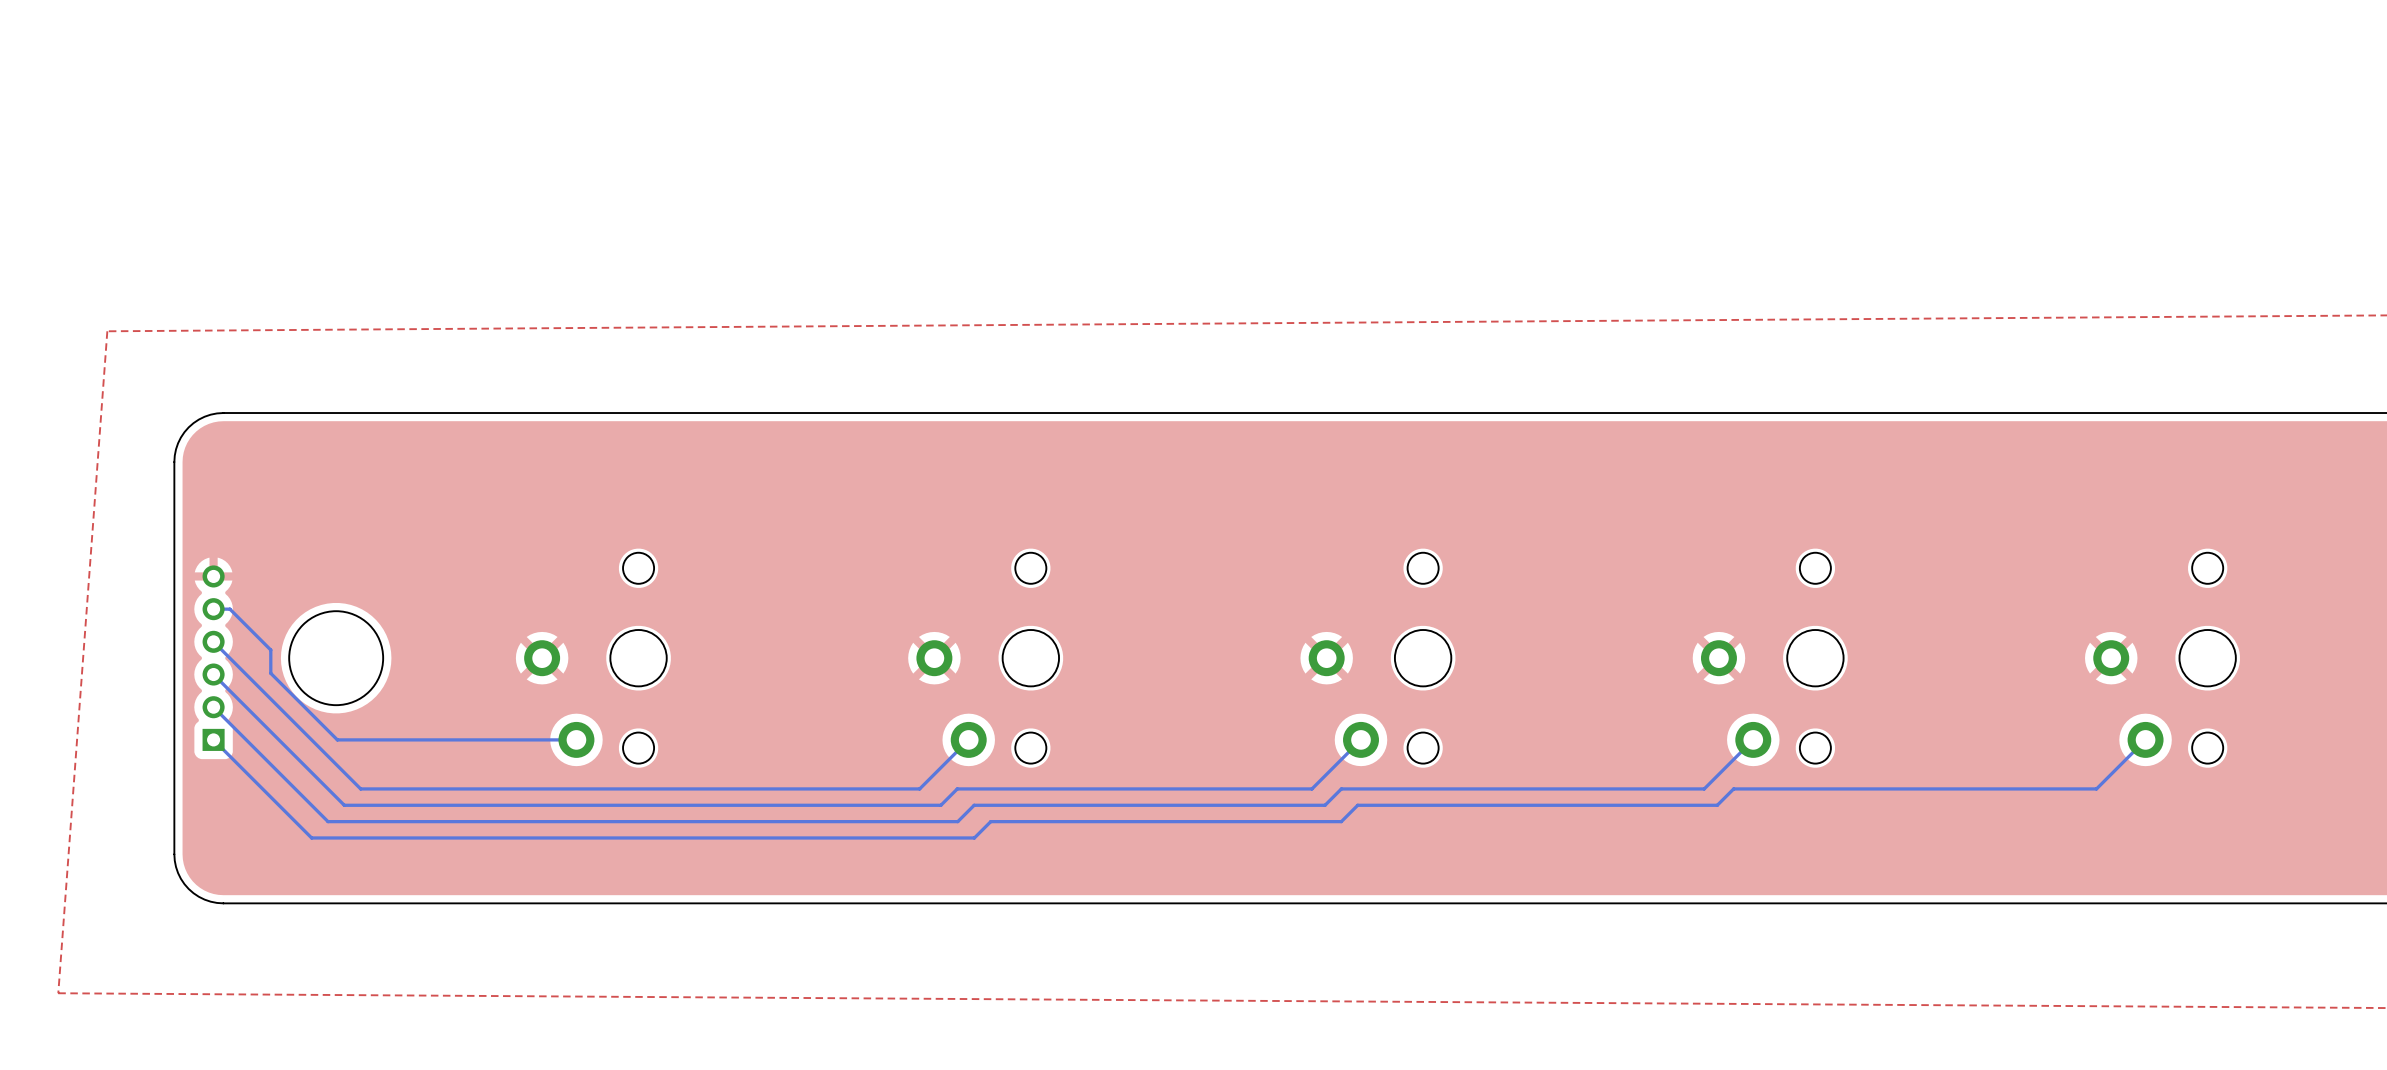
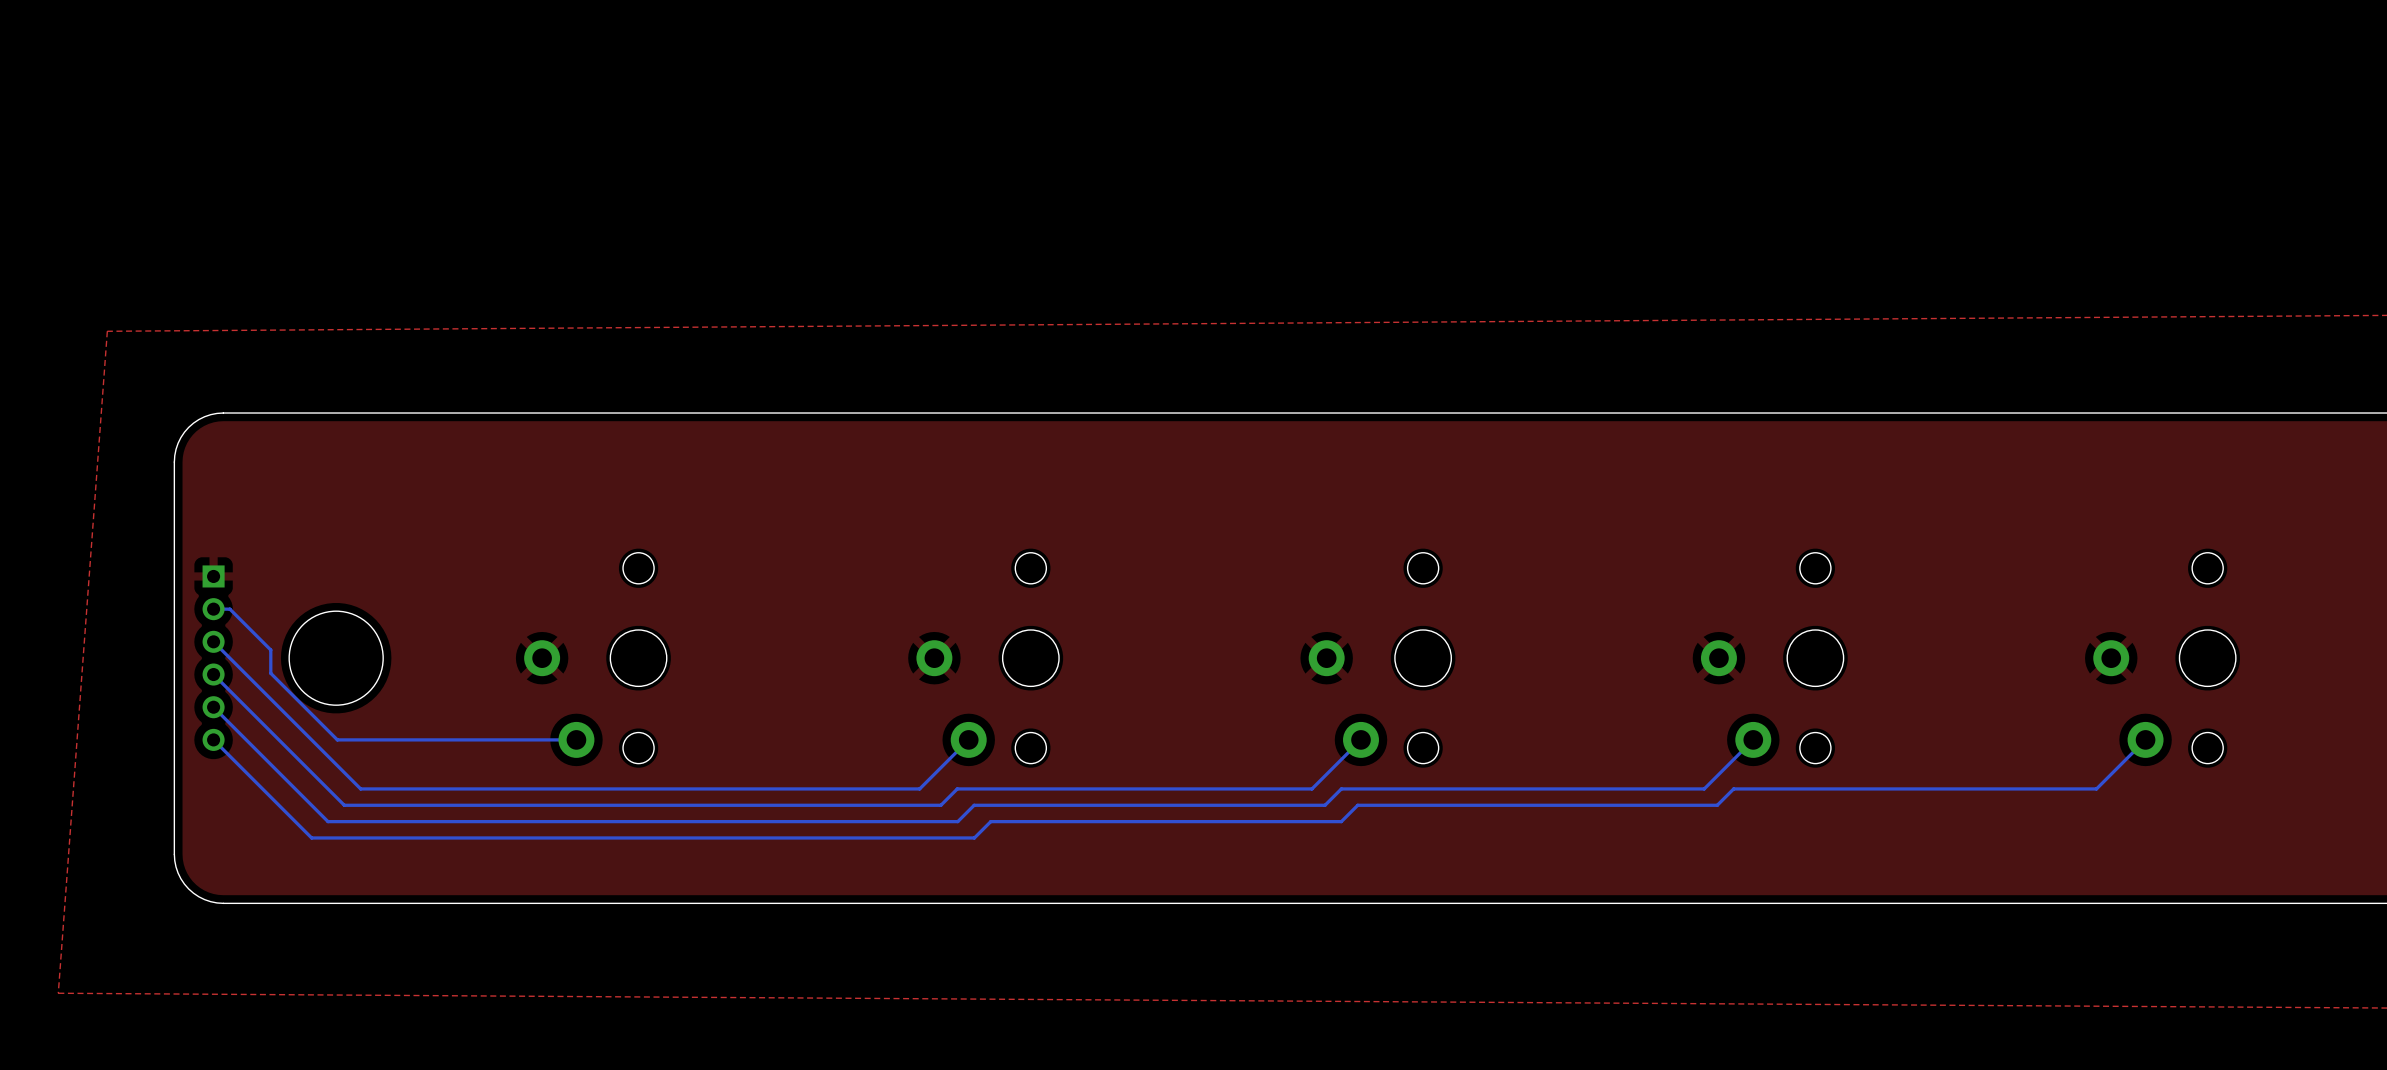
part rotation: 0° (213, 658) -> 180° (213, 658)

